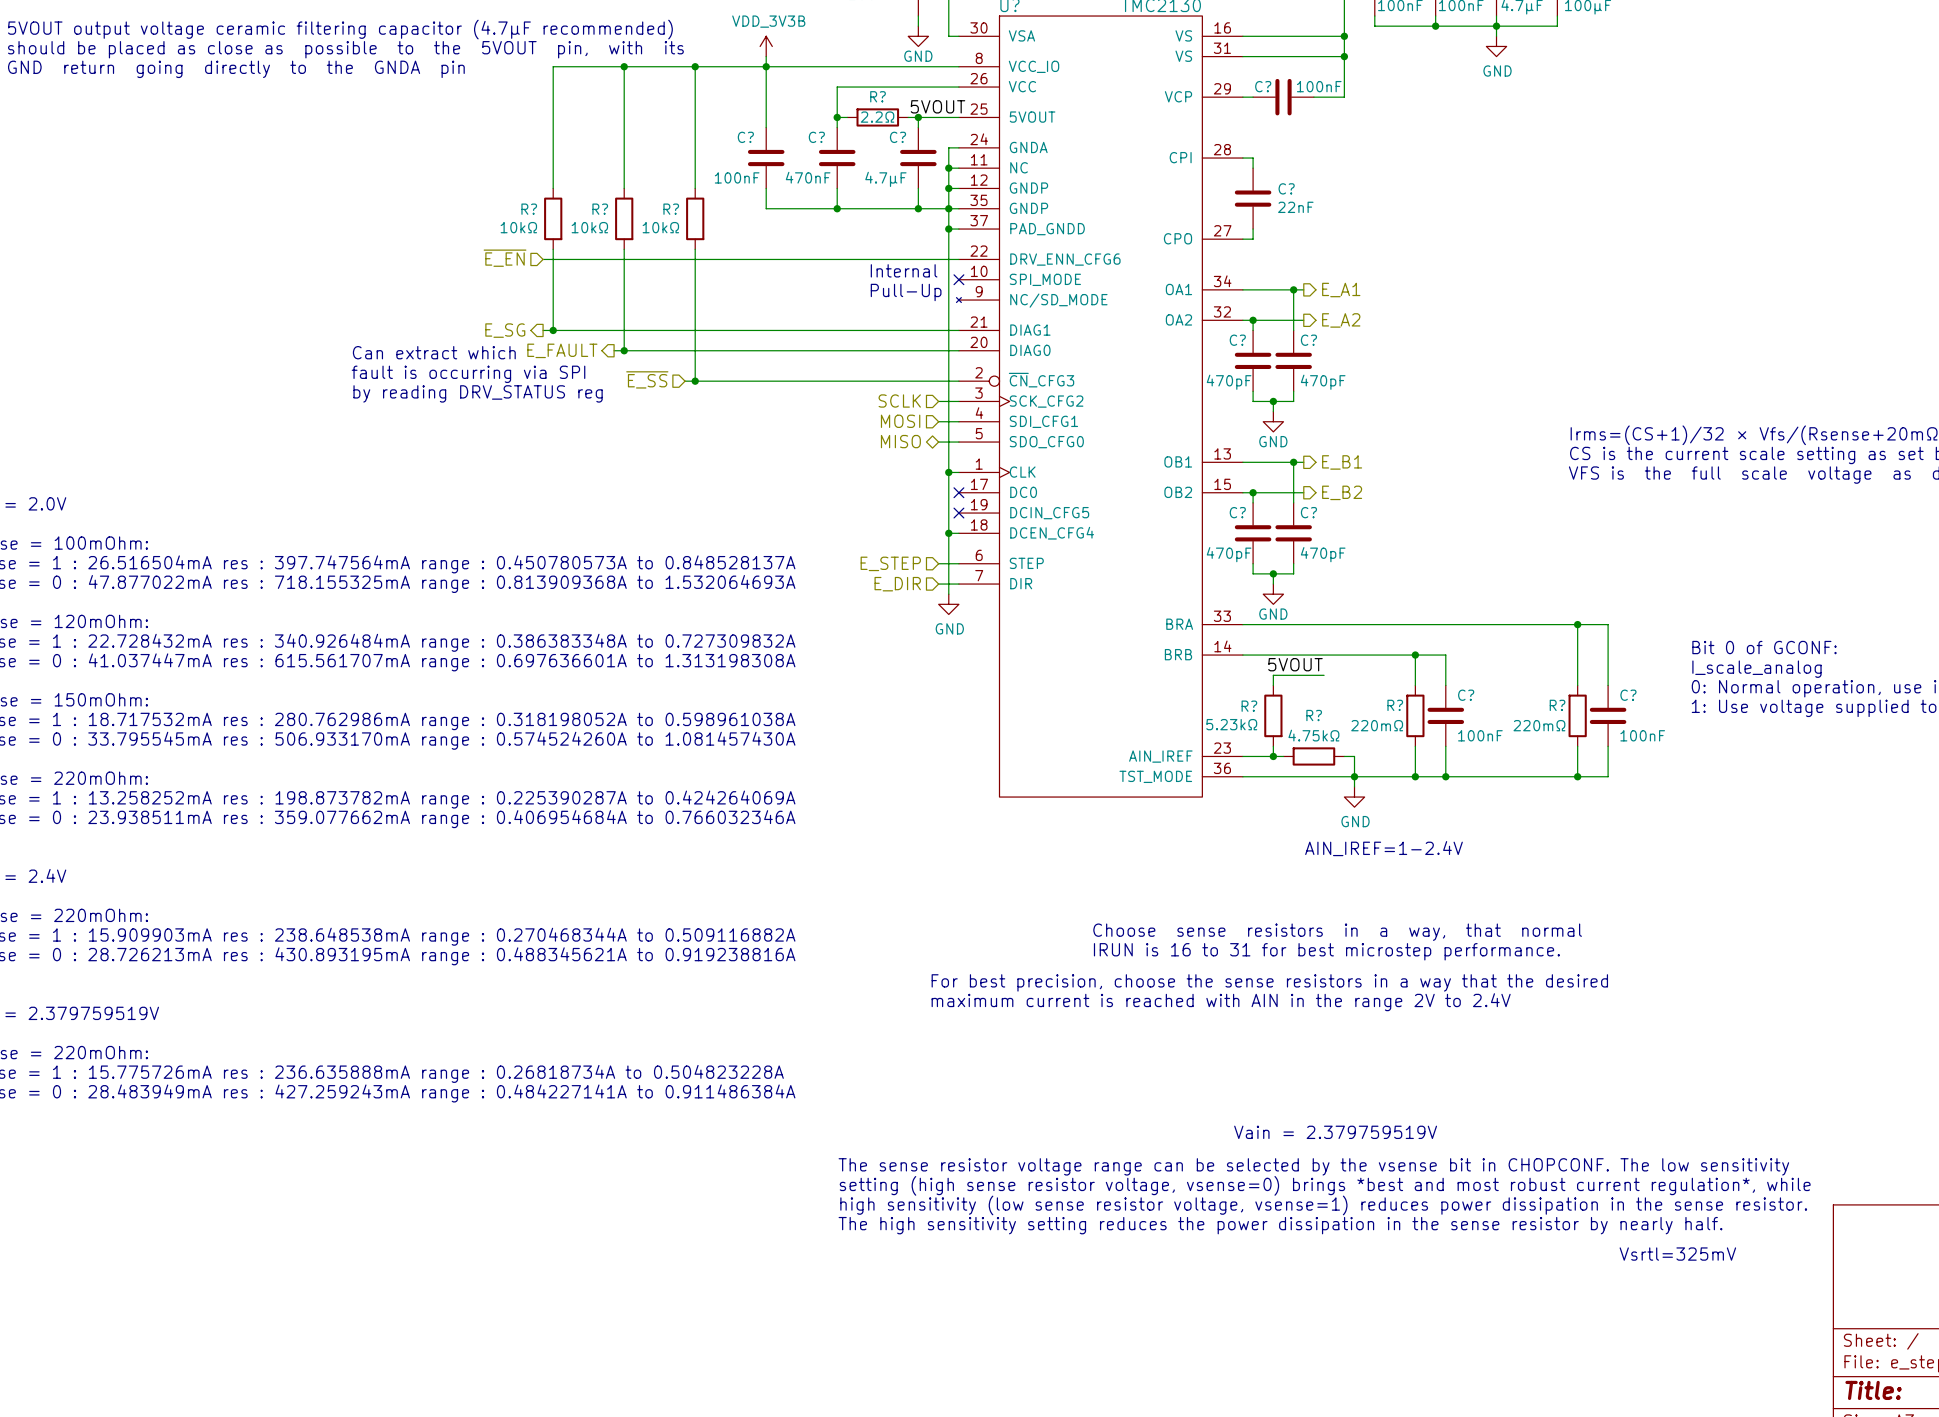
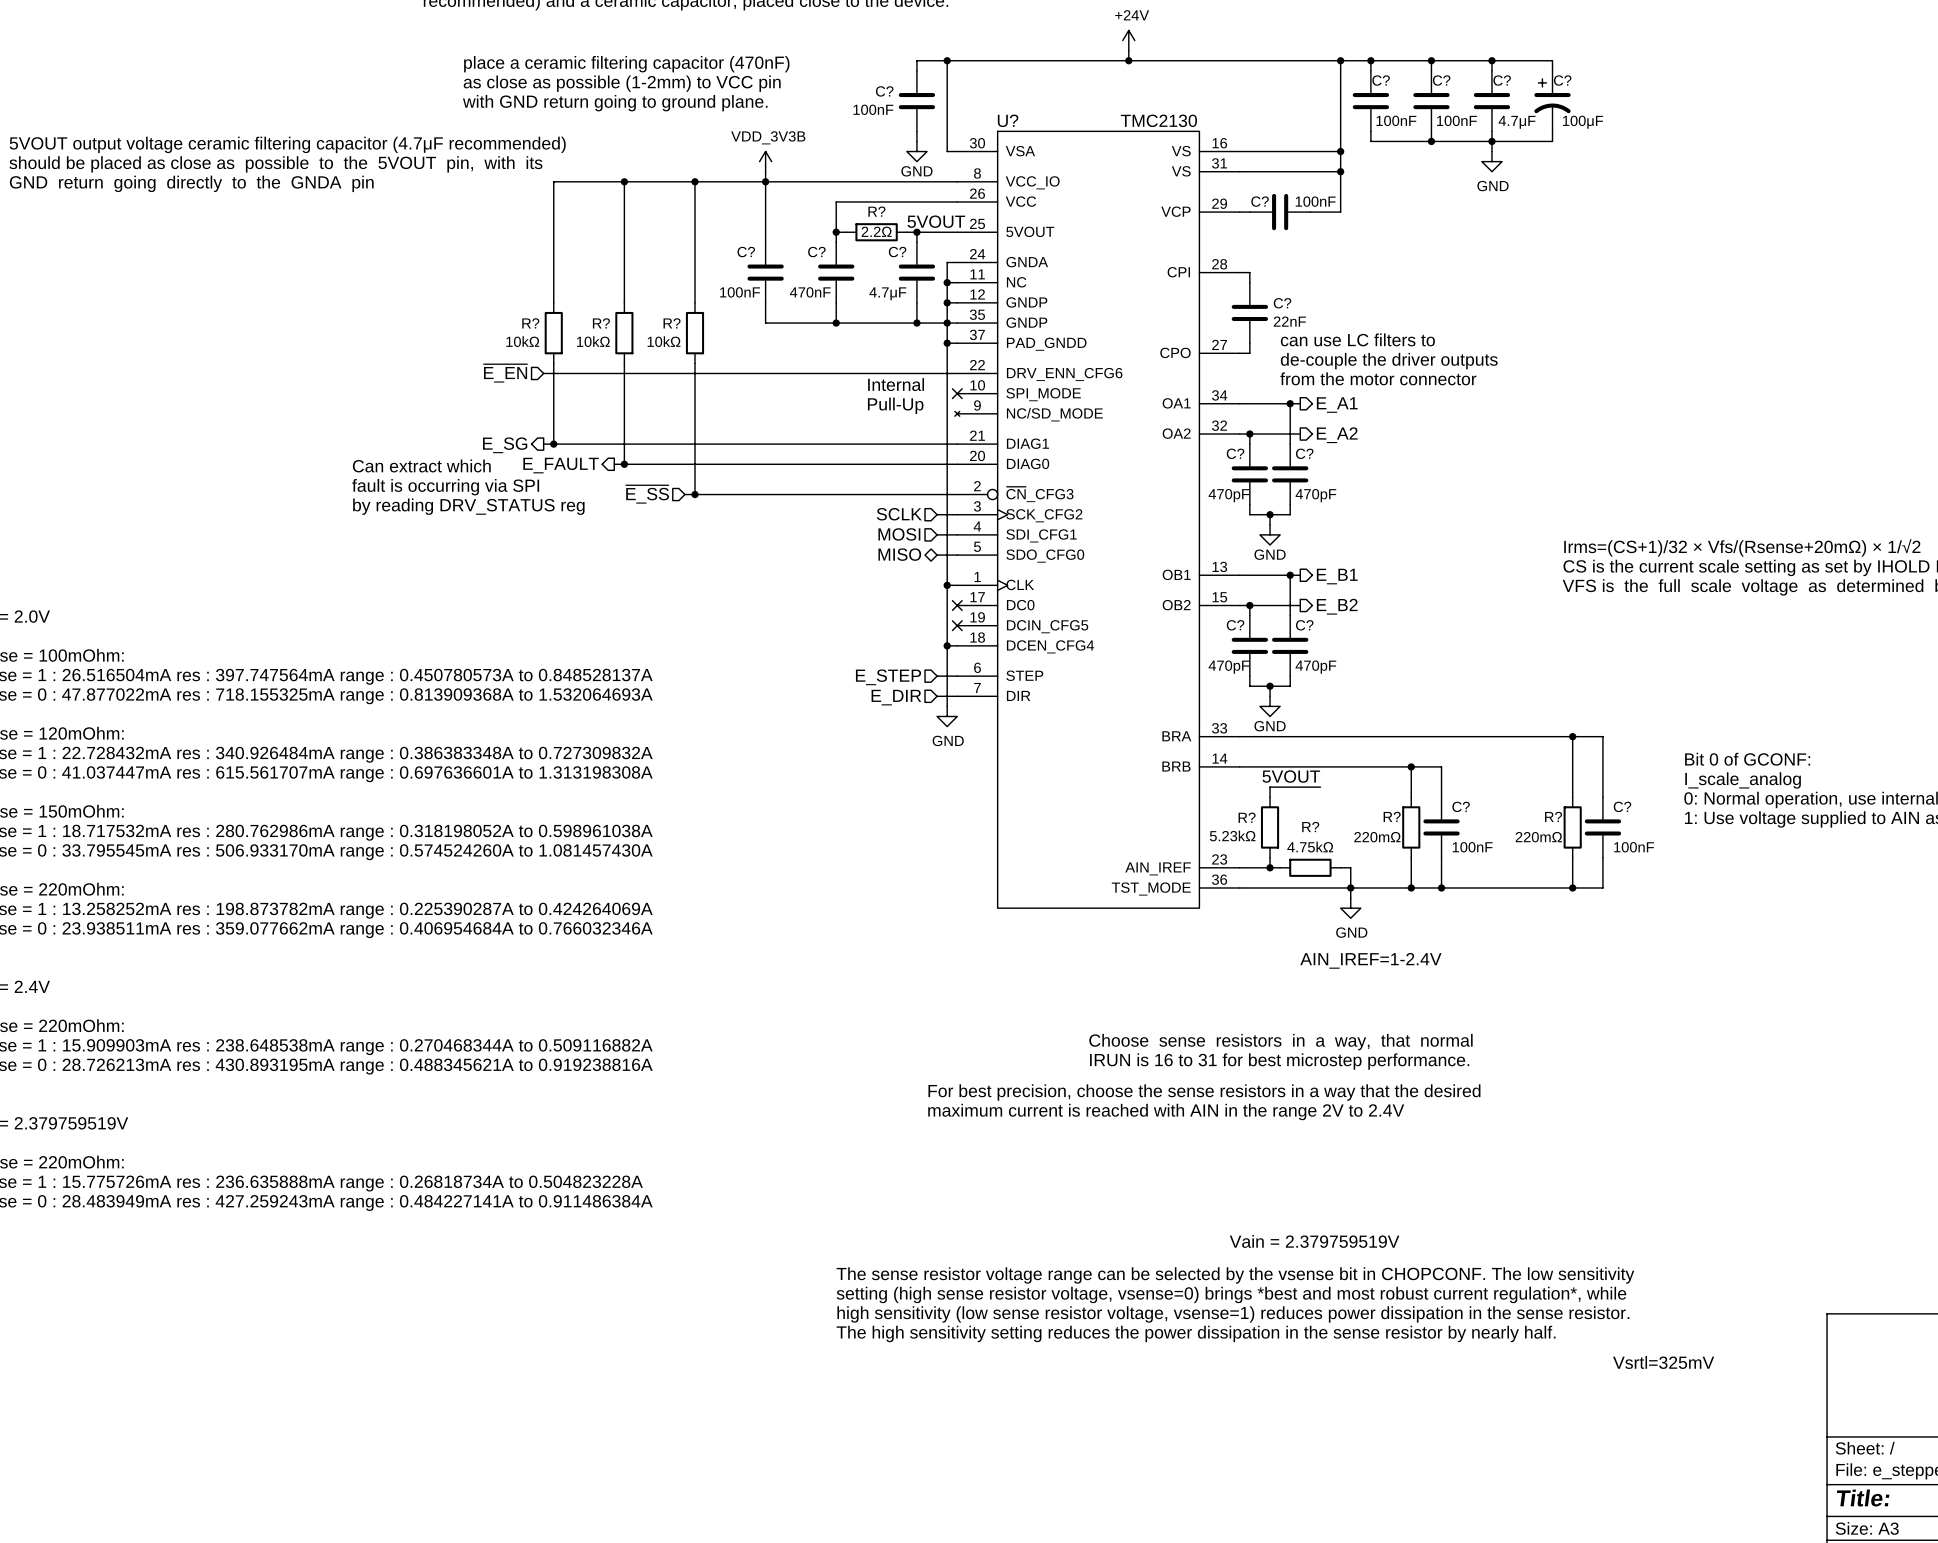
text: none -> can use LC filters to (1357, 339)
text: none -> de-couple the driver outputs (1389, 361)
text: none -> from the motor connector (1378, 378)

